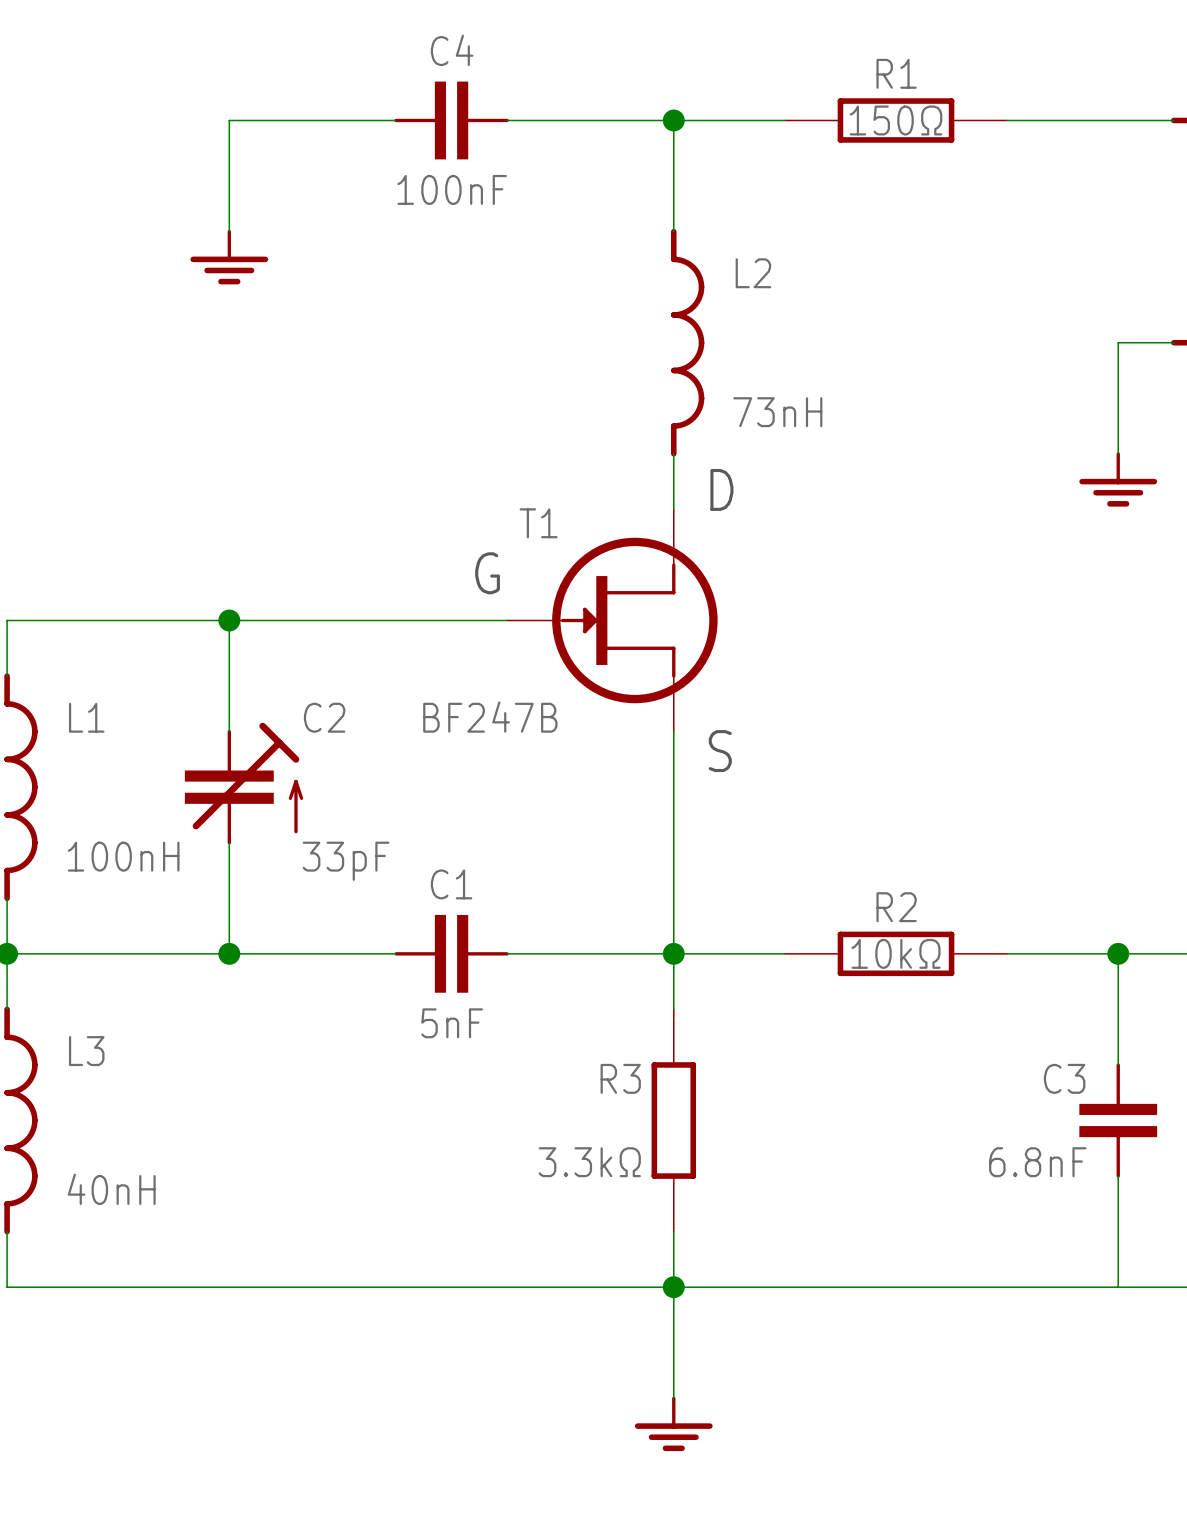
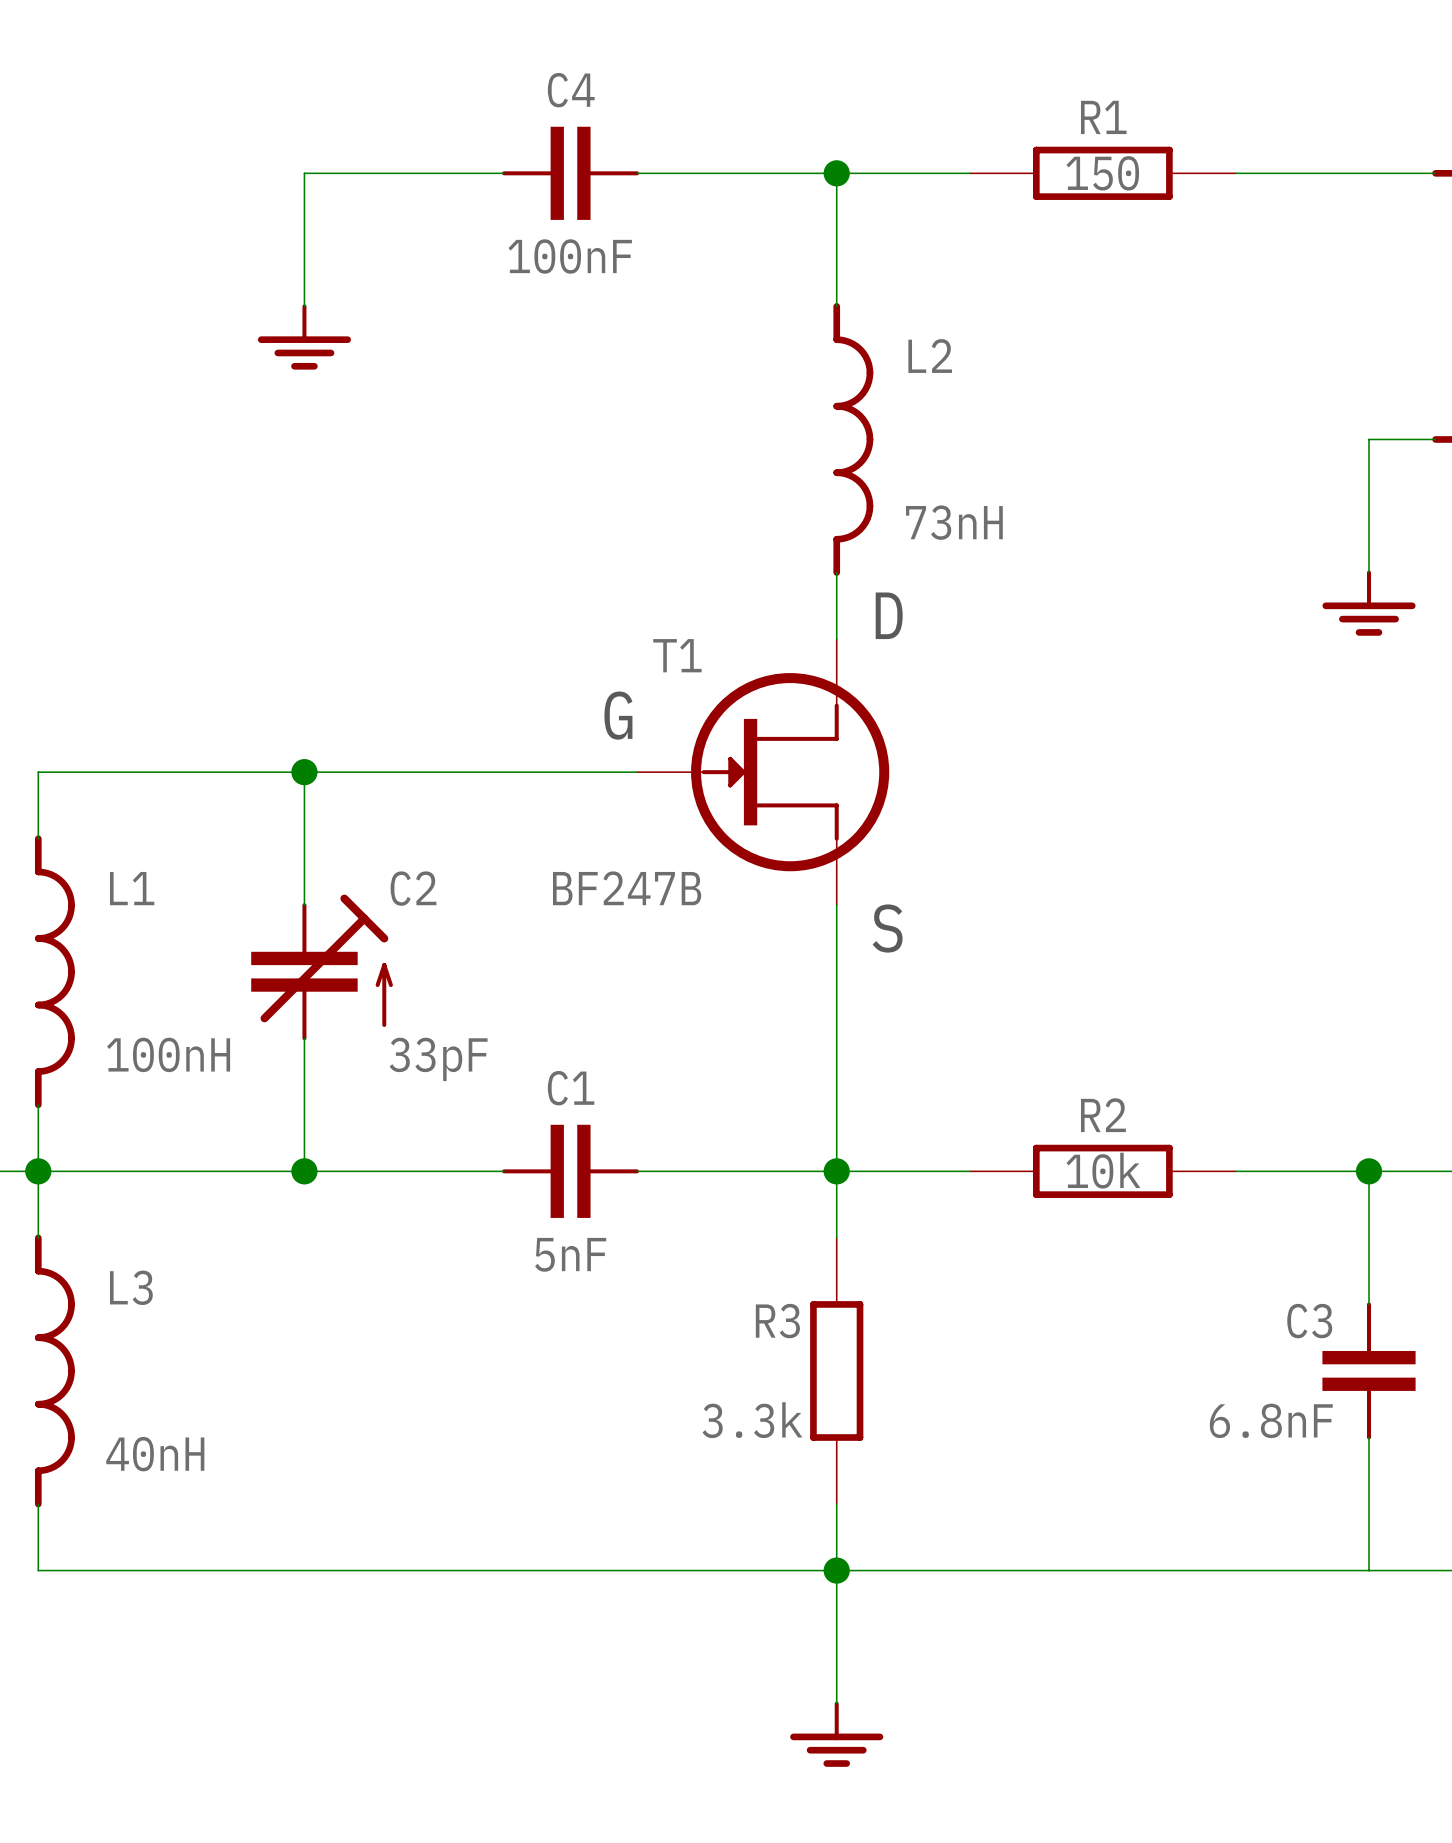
R1 value: 150Ω (896, 120) -> 150 (1102, 173)
R2 value: 10kΩ (896, 953) -> 10k (1103, 1170)
R3 value: 3.3kΩ (589, 1162) -> 3.3k (752, 1420)

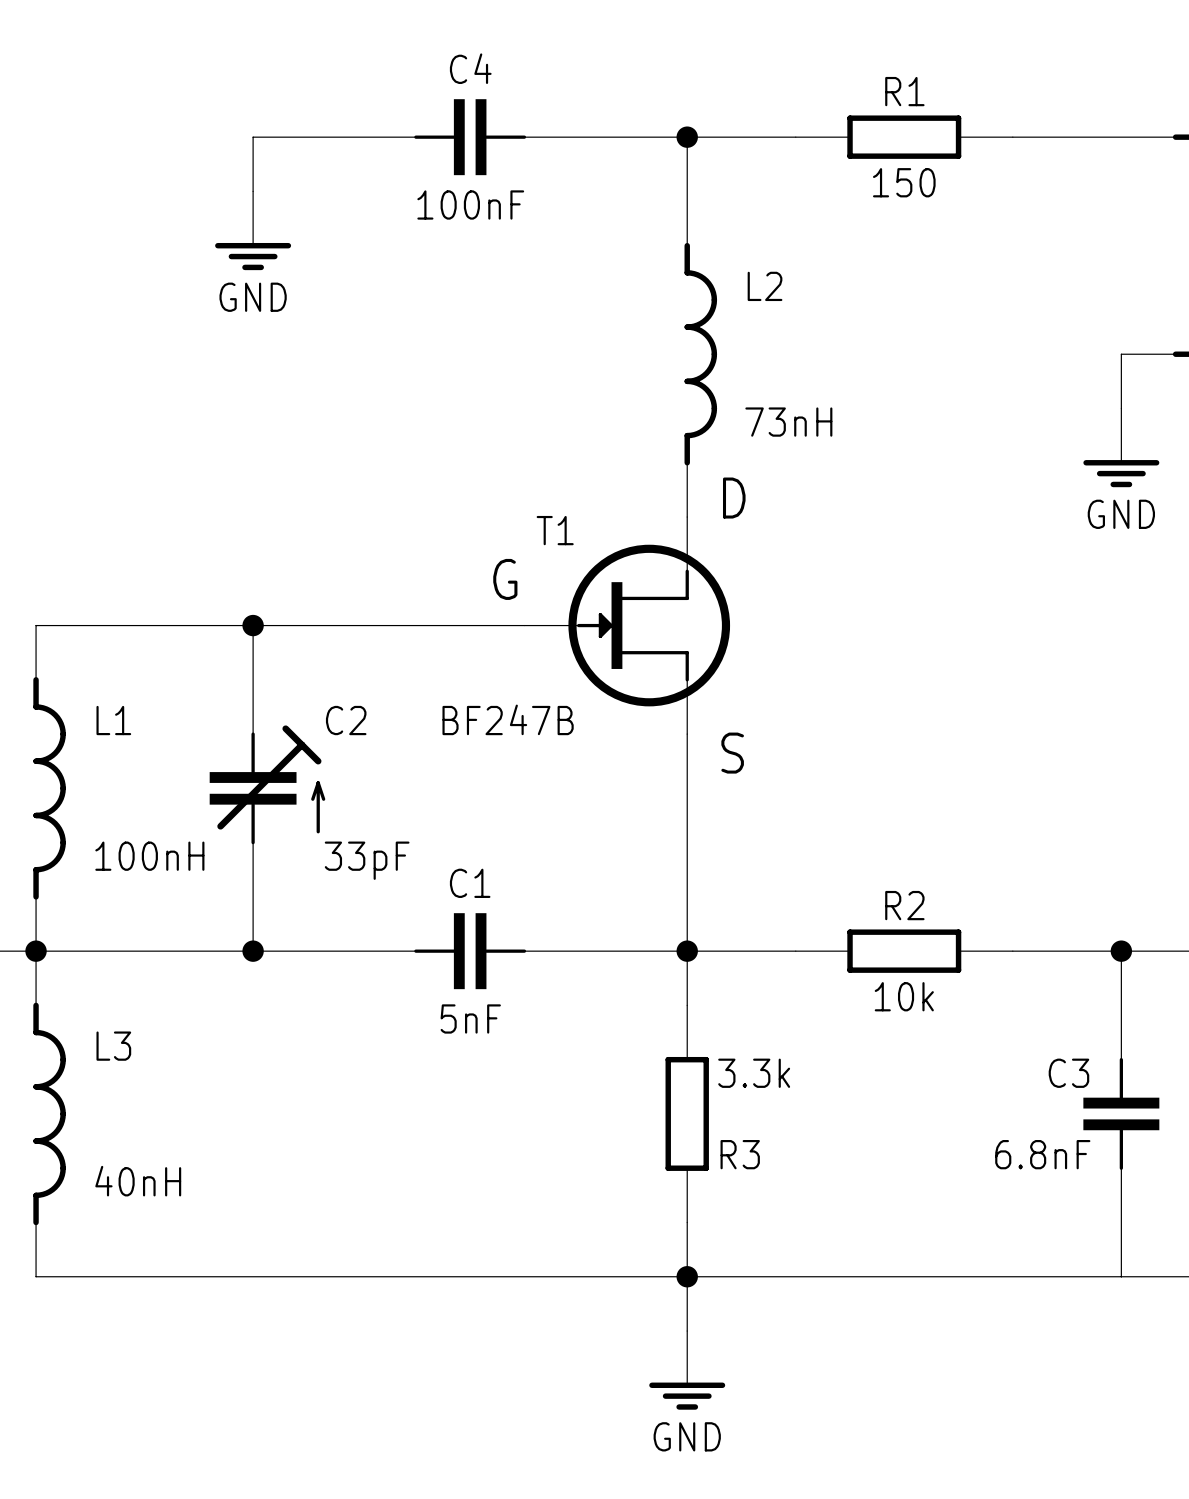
R1 value position: 150 (1102, 173) -> 150 (904, 182)
power symbol: none -> GND (253, 230)
power symbol: (304, 337) -> none
power symbol: none -> GND (1121, 447)
power symbol: (1369, 603) -> none
R2 value position: 10k (1103, 1170) -> 10k (904, 996)
R3 name position: R3 (777, 1321) -> R3 (740, 1154)
R3 value position: 3.3k (752, 1420) -> 3.3k (754, 1073)
power symbol: none -> GND (687, 1370)
power symbol: (836, 1734) -> none

